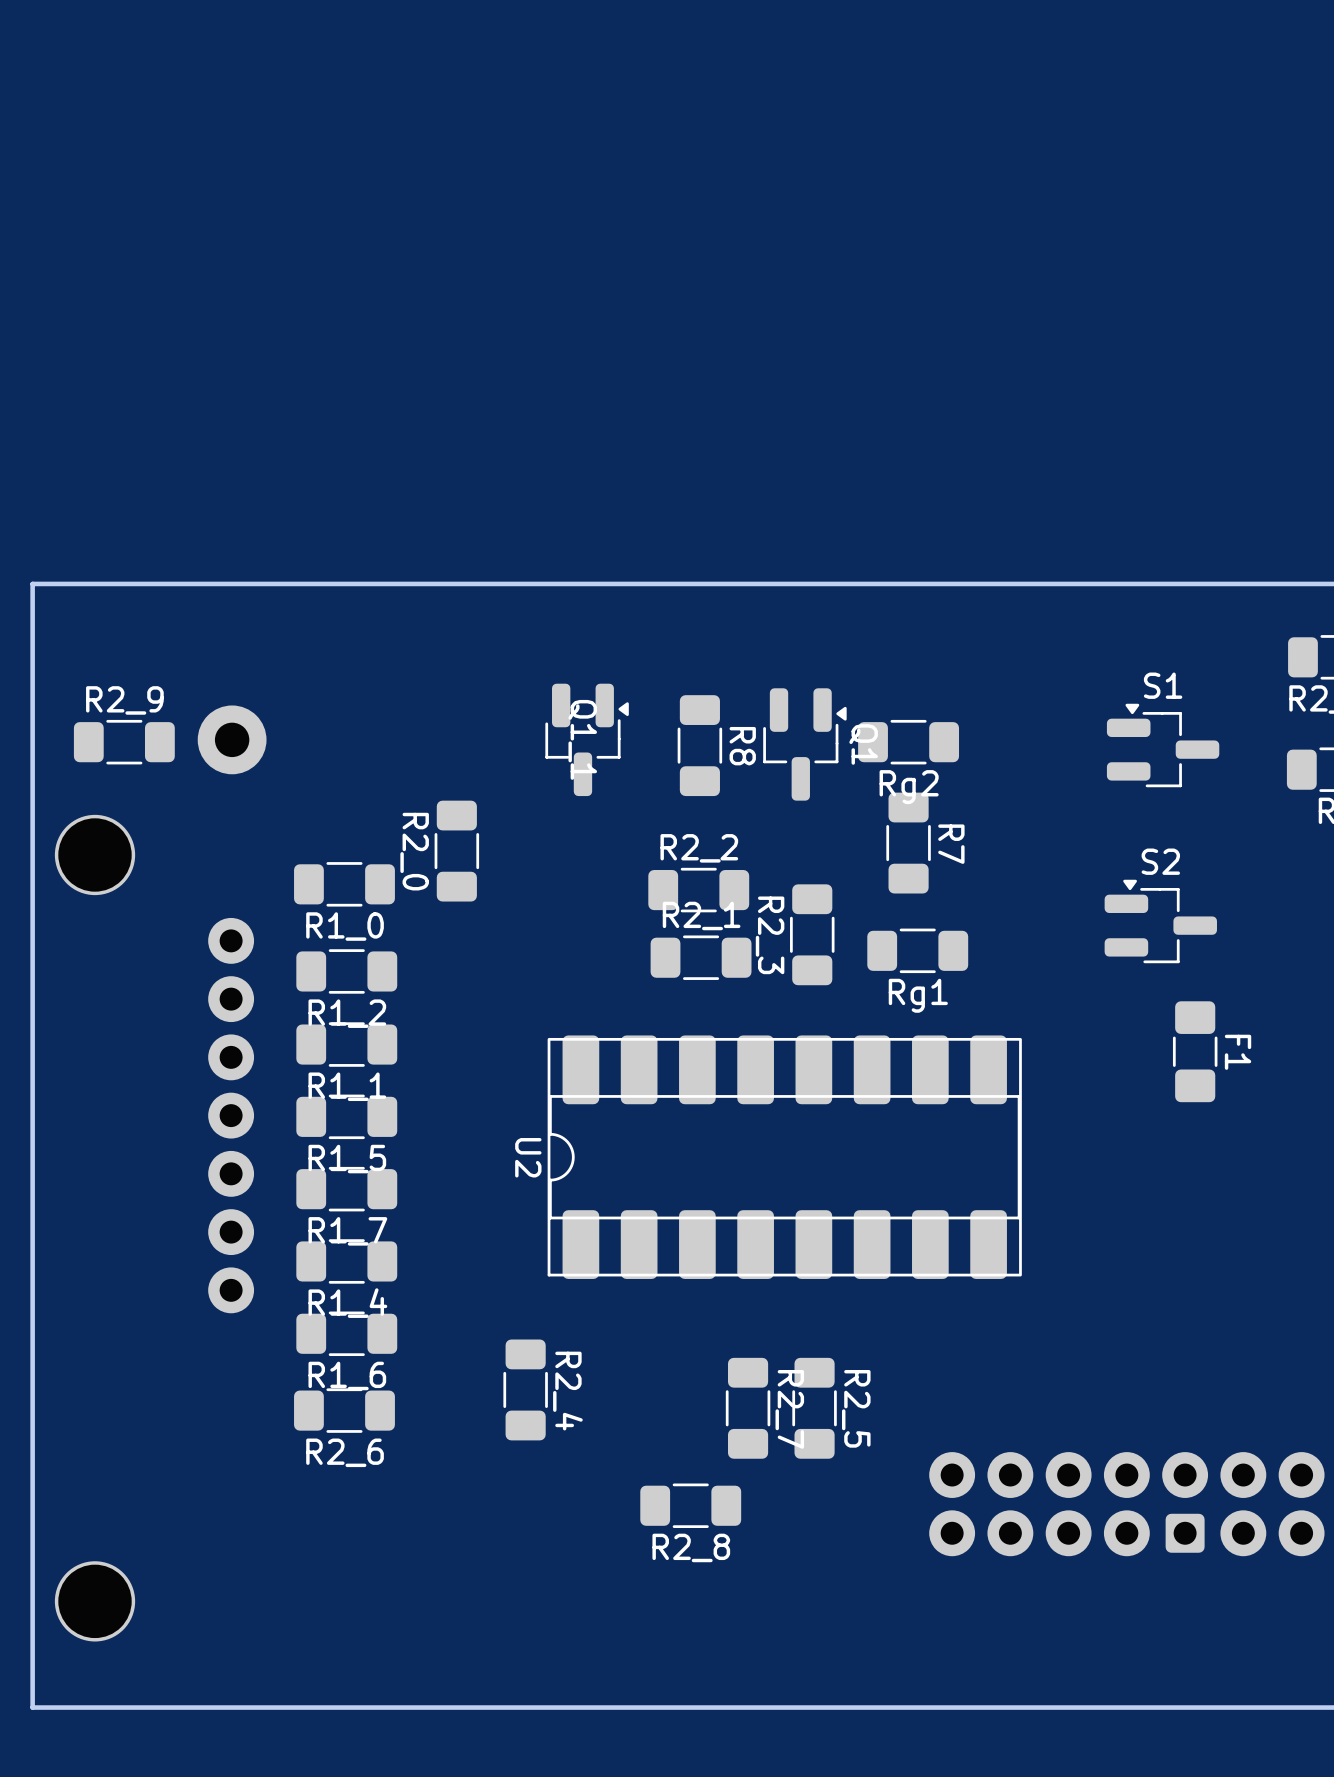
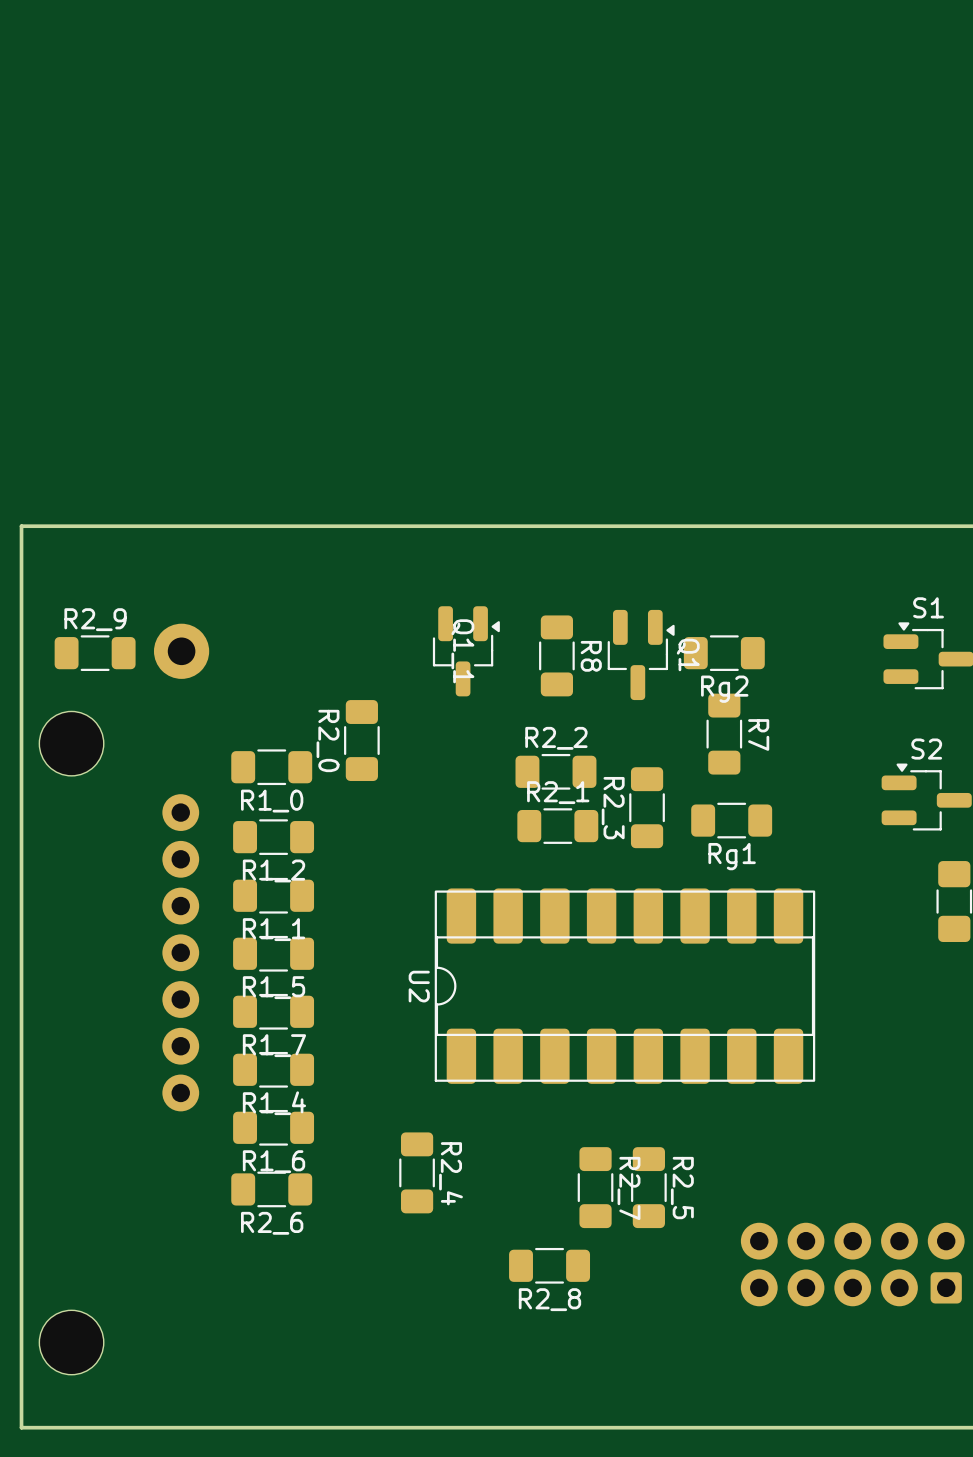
part footprint: [54, 814, 136, 896] -> [39, 711, 104, 776]
part footprint: [54, 1561, 136, 1642] -> [39, 1310, 104, 1375]

